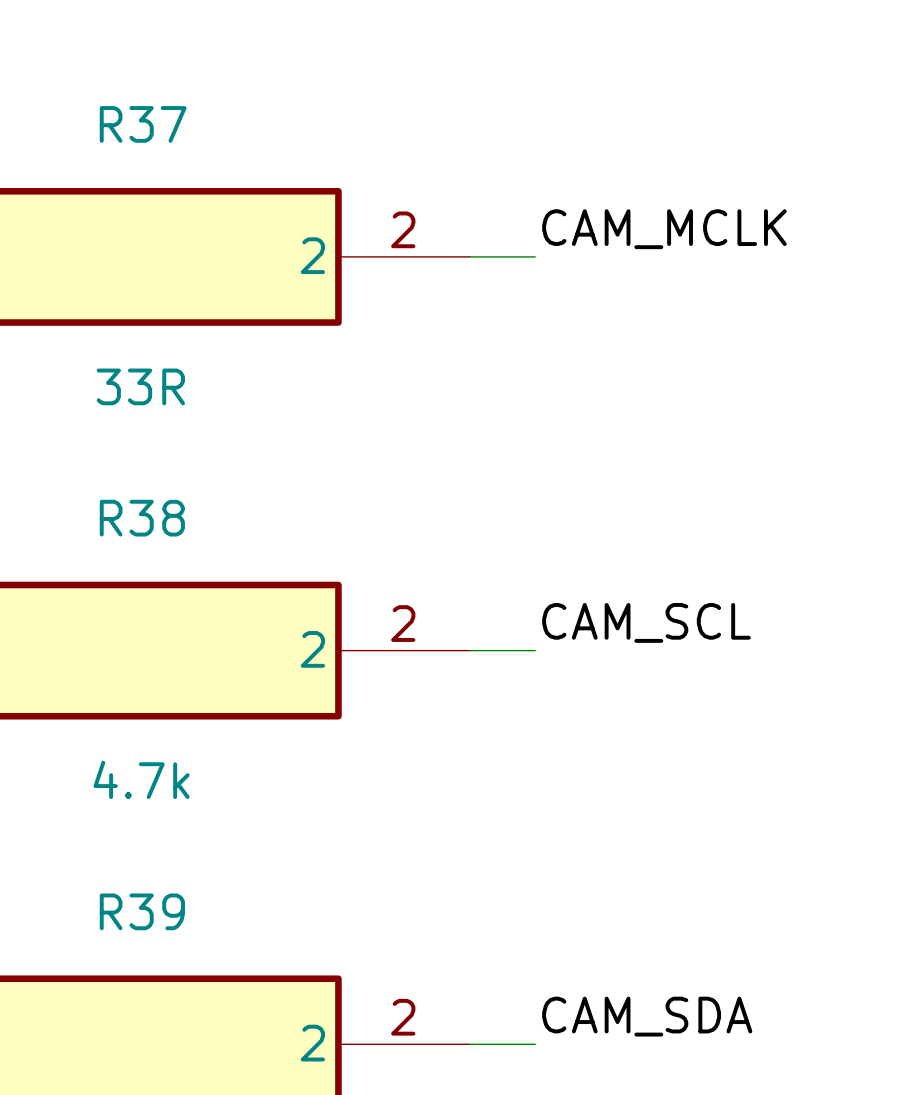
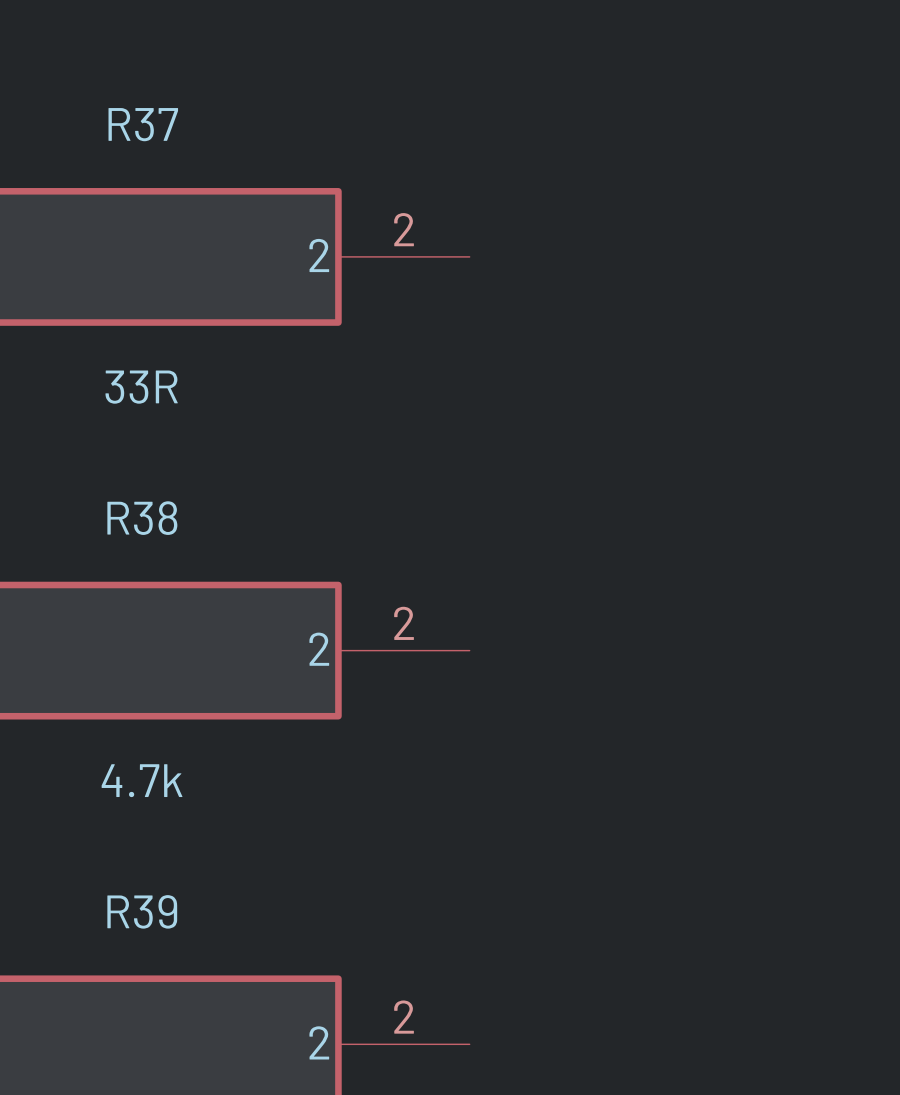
label: CAM_MCLK (664, 229) -> none
wire: (469, 256) (535, 256) -> none
label: CAM_SCL (646, 622) -> none
wire: (469, 650) (535, 650) -> none
label: CAM_SDA (647, 1016) -> none
wire: (469, 1044) (535, 1044) -> none

